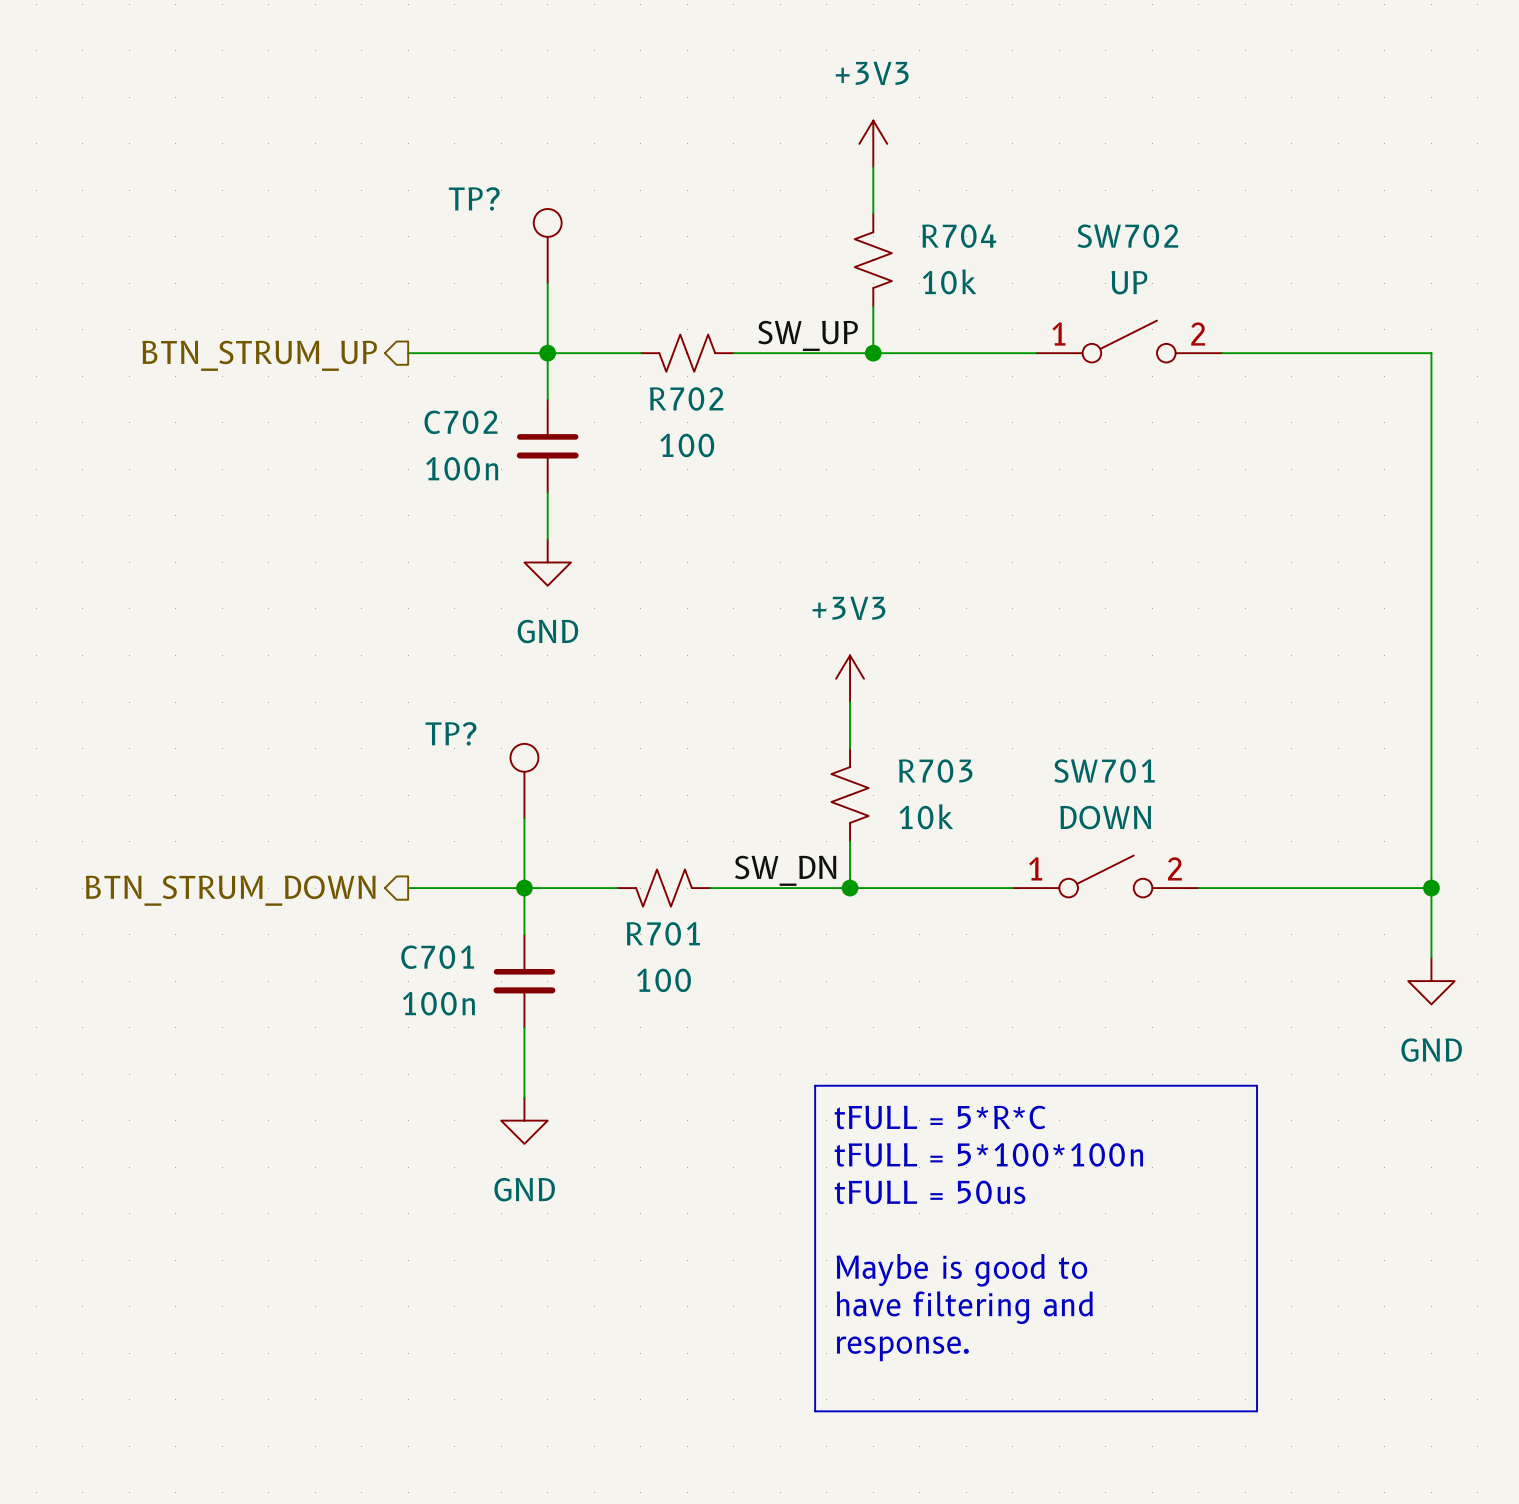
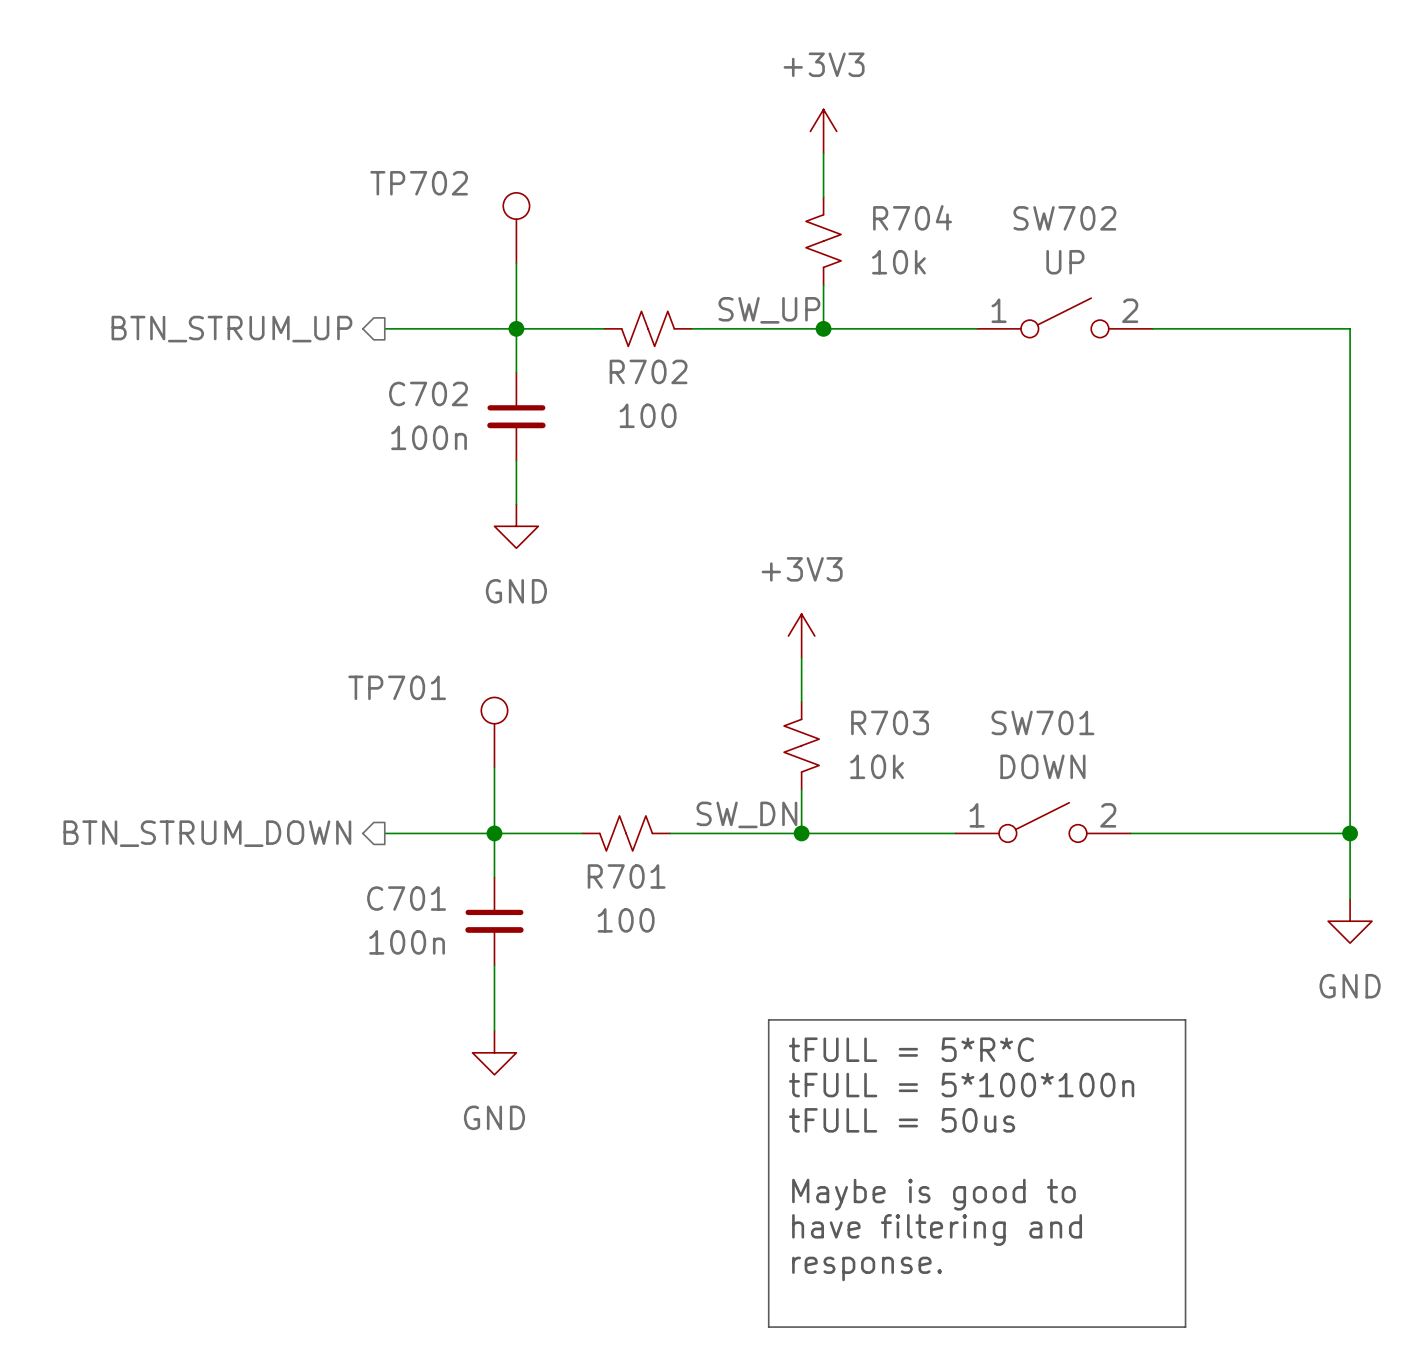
TP? name: TP? (474, 198) -> TP702 (419, 183)
TP? name: TP? (451, 733) -> TP701 (397, 687)

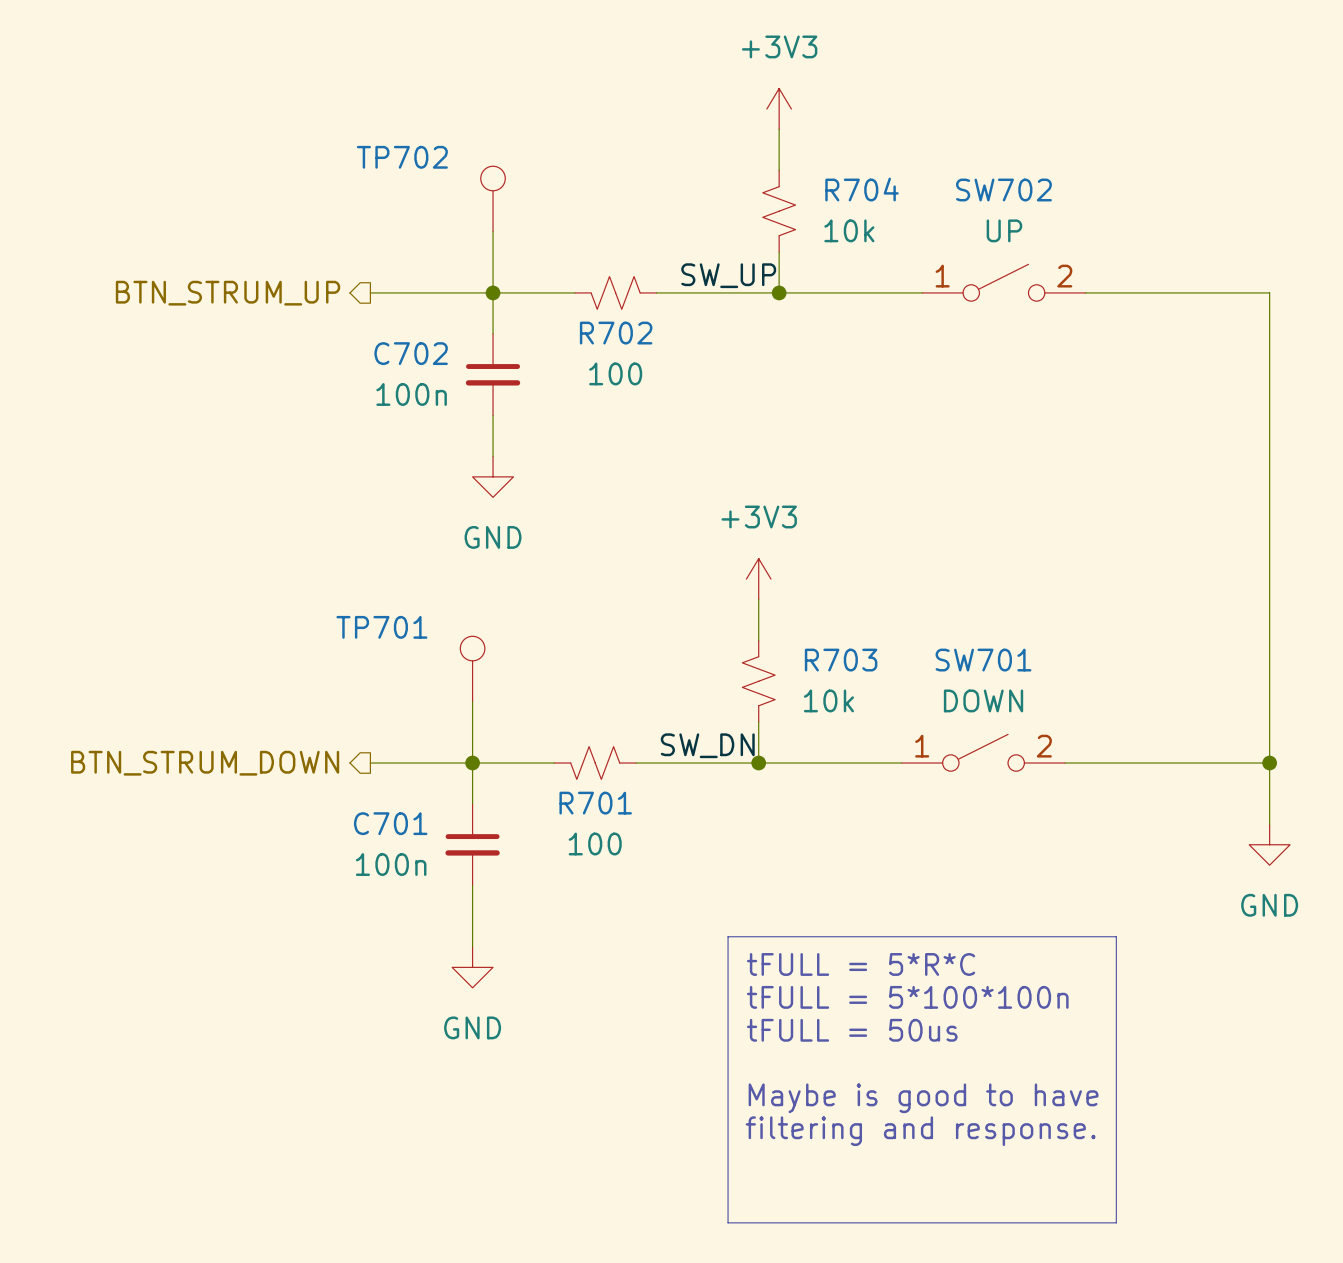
text: Maybe is good to (933, 1194) -> Maybe is good to have (923, 1098)
text: have filtering and (937, 1229) -> filtering and response. (920, 1131)
text: response. (867, 1268) -> none

